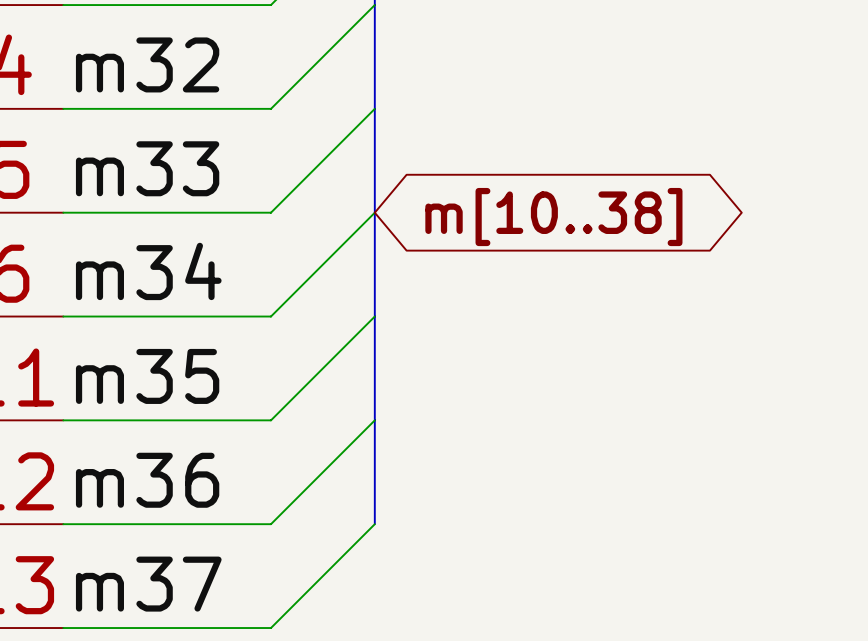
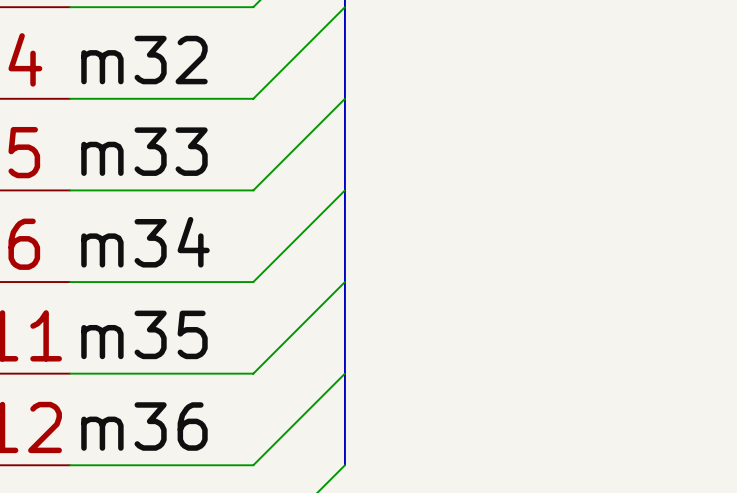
global label: m[10..38] (553, 217) -> none

